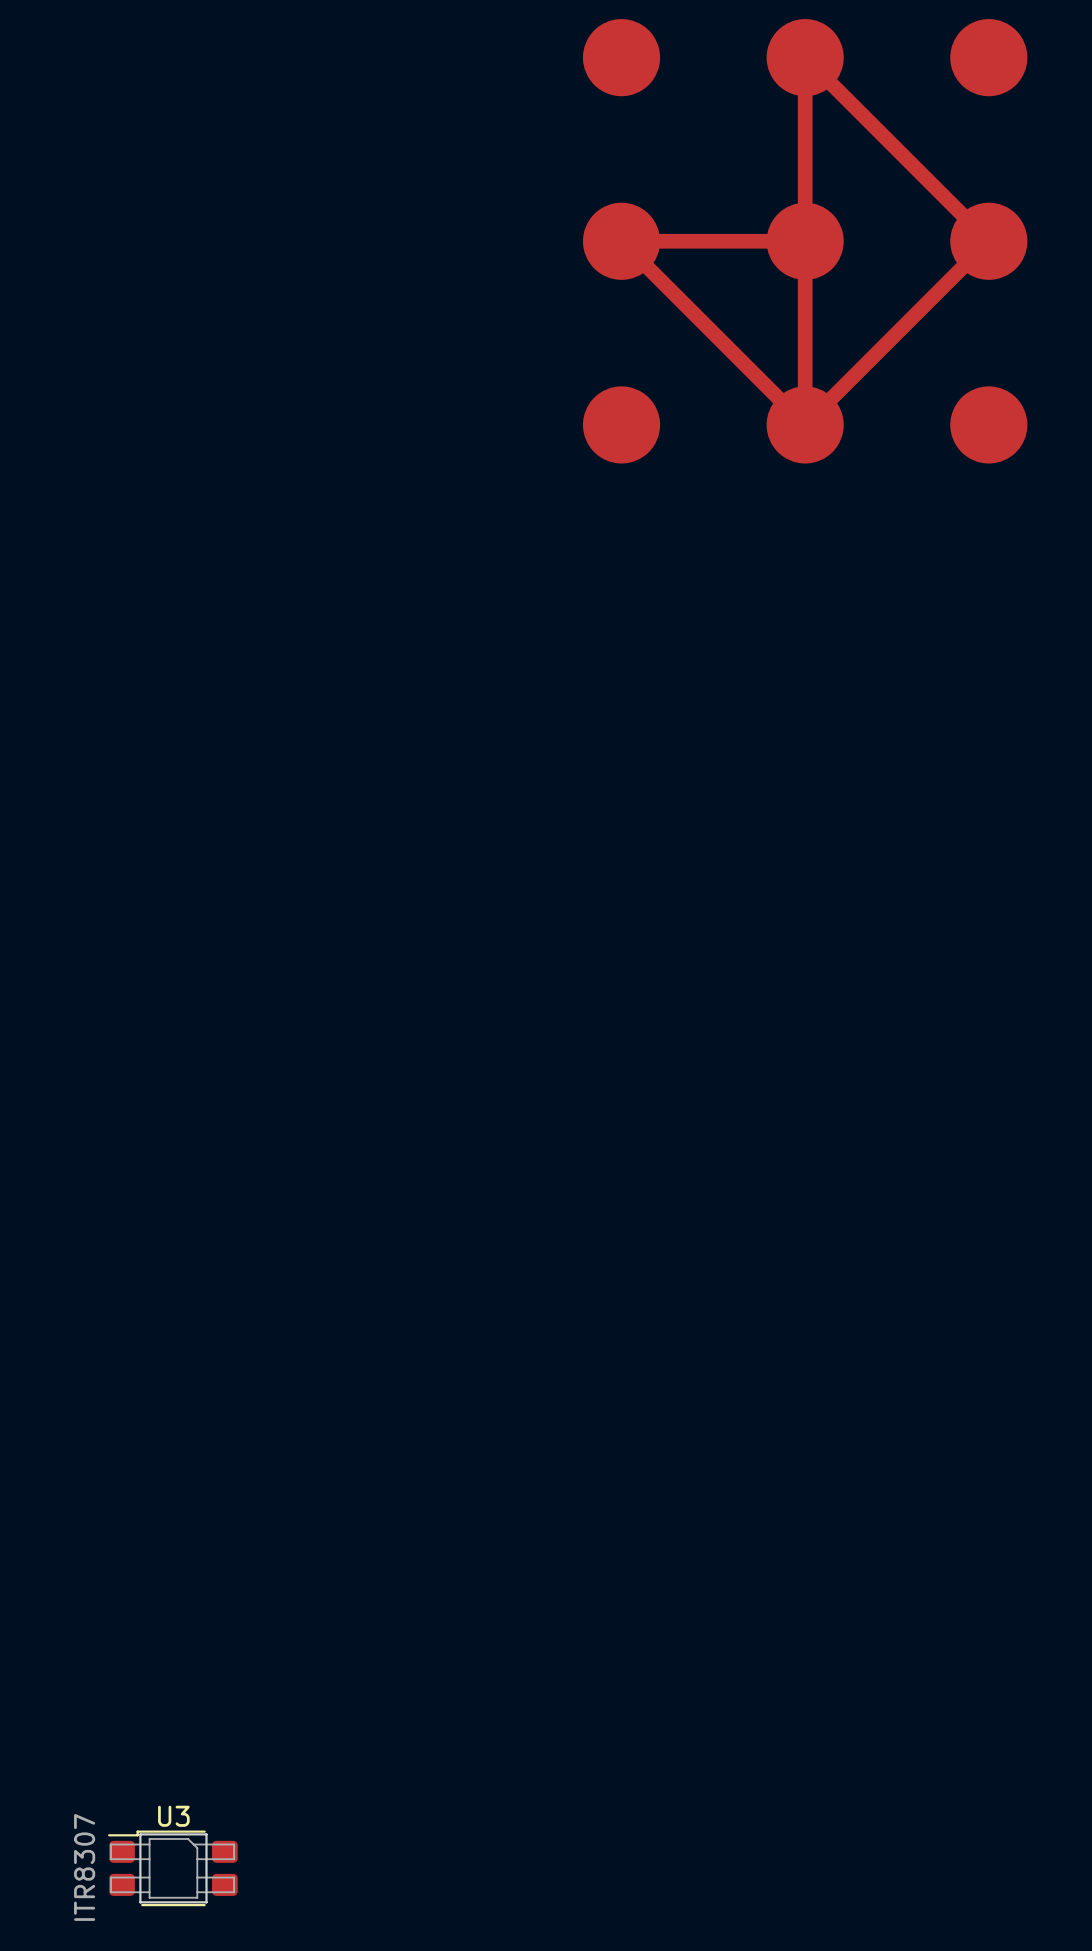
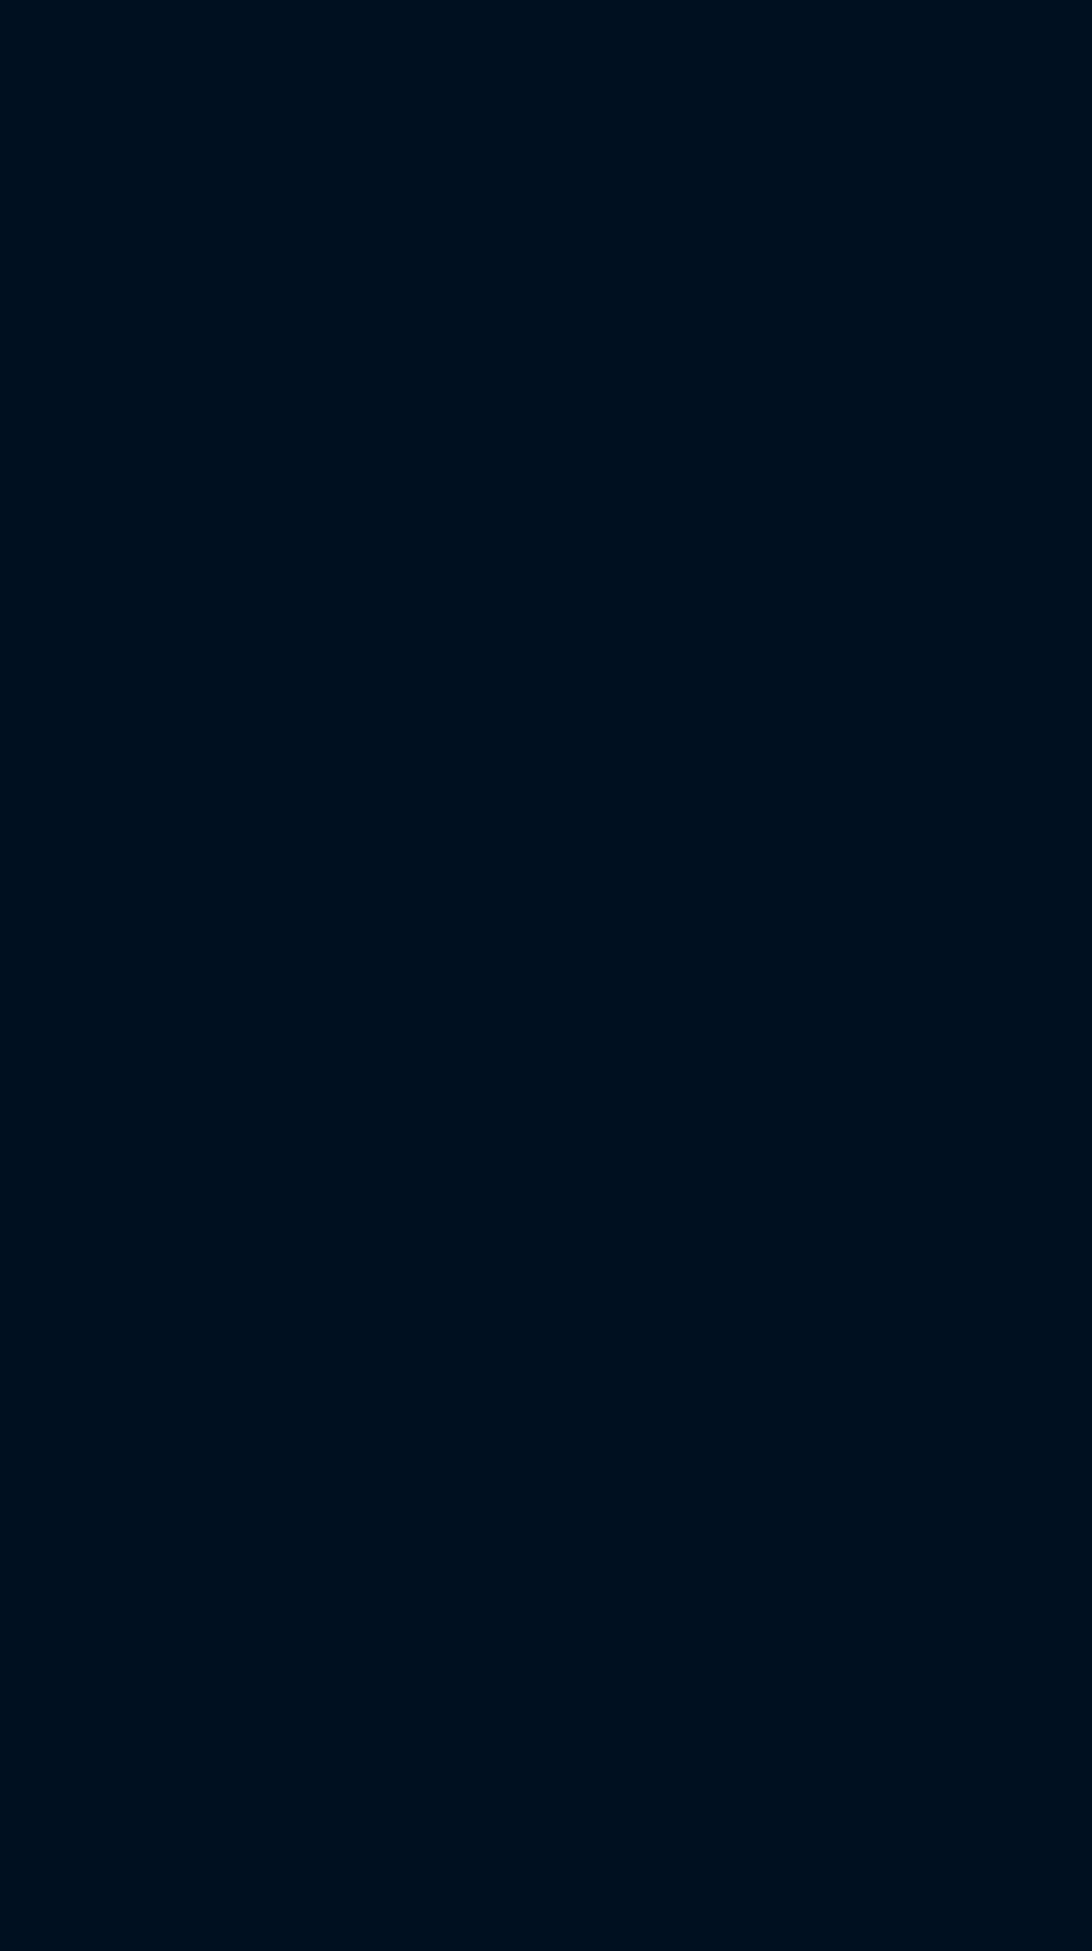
drawing: [582, 19, 661, 97] -> none
drawing: [766, 19, 844, 97] -> none
drawing: [950, 19, 1028, 97] -> none
drawing: [582, 202, 661, 280] -> none
drawing: [766, 202, 844, 280] -> none
drawing: [950, 202, 1028, 280] -> none
track: (805, 241) (621, 241) (805, 424) -> none
drawing: [582, 386, 661, 464] -> none
drawing: [766, 386, 844, 464] -> none
drawing: [950, 386, 1028, 464] -> none
track: (805, 424) (805, 57) (988, 241) (805, 424) -> none
U3: ITR8307 (172, 1868) -> none

